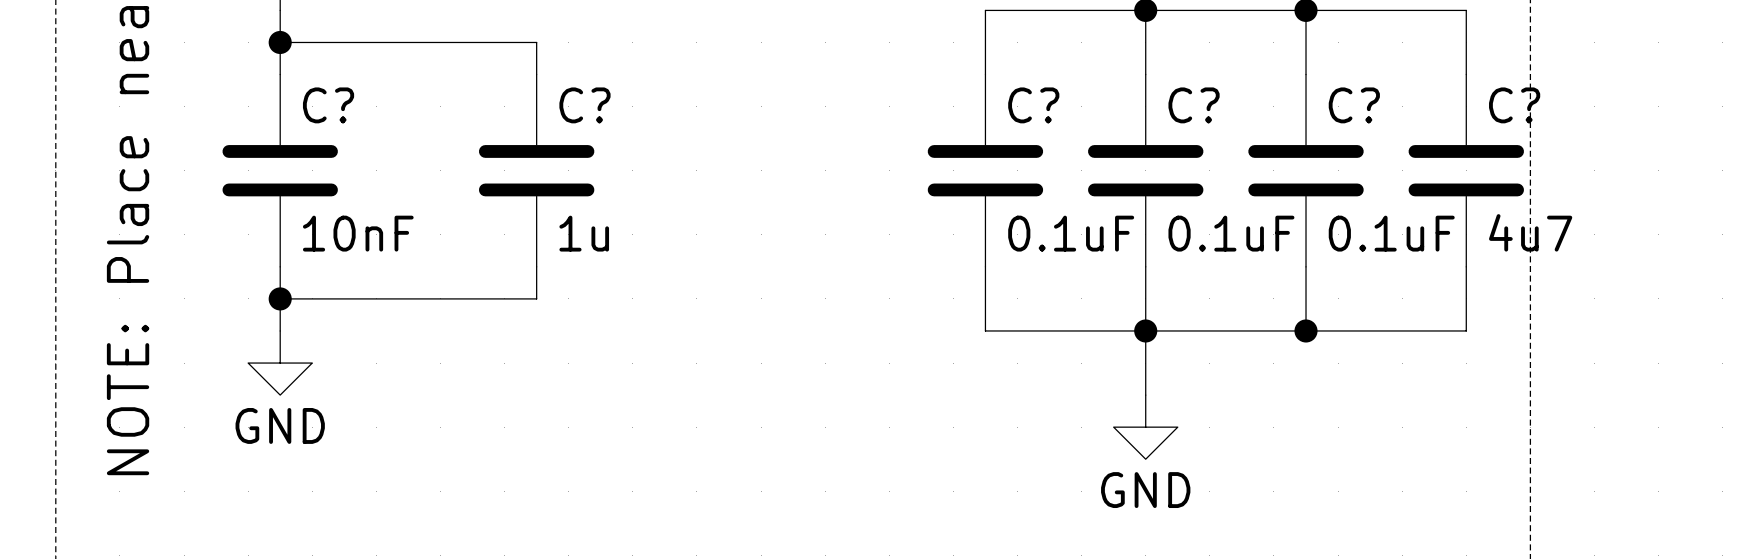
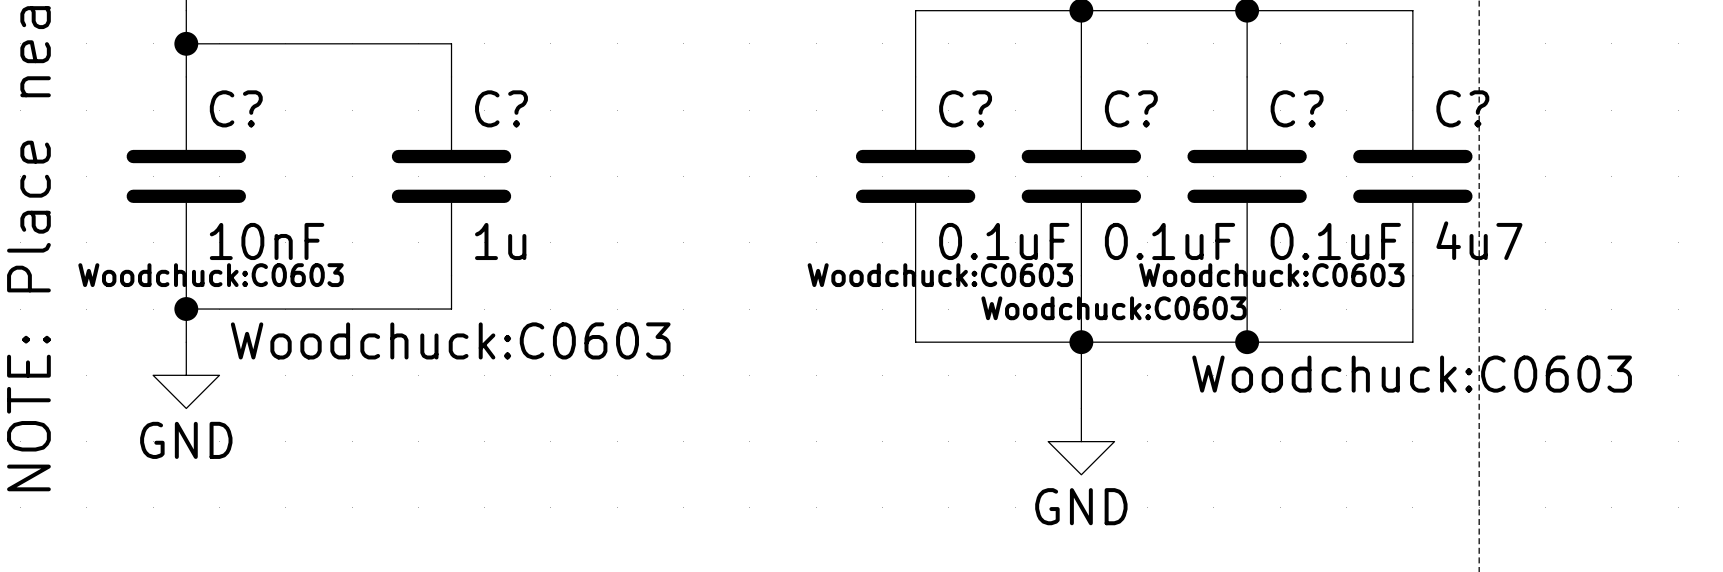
C? text: none -> Woodchuck:C0603 (211, 275)
C? text: none -> Woodchuck:C0603 (940, 275)
C? text: none -> Woodchuck:C0603 (1271, 275)
C? text: none -> Woodchuck:C0603 (1114, 308)
C? text: none -> Woodchuck:C0603 (450, 340)
C? text: none -> Woodchuck:C0603 (1412, 374)

